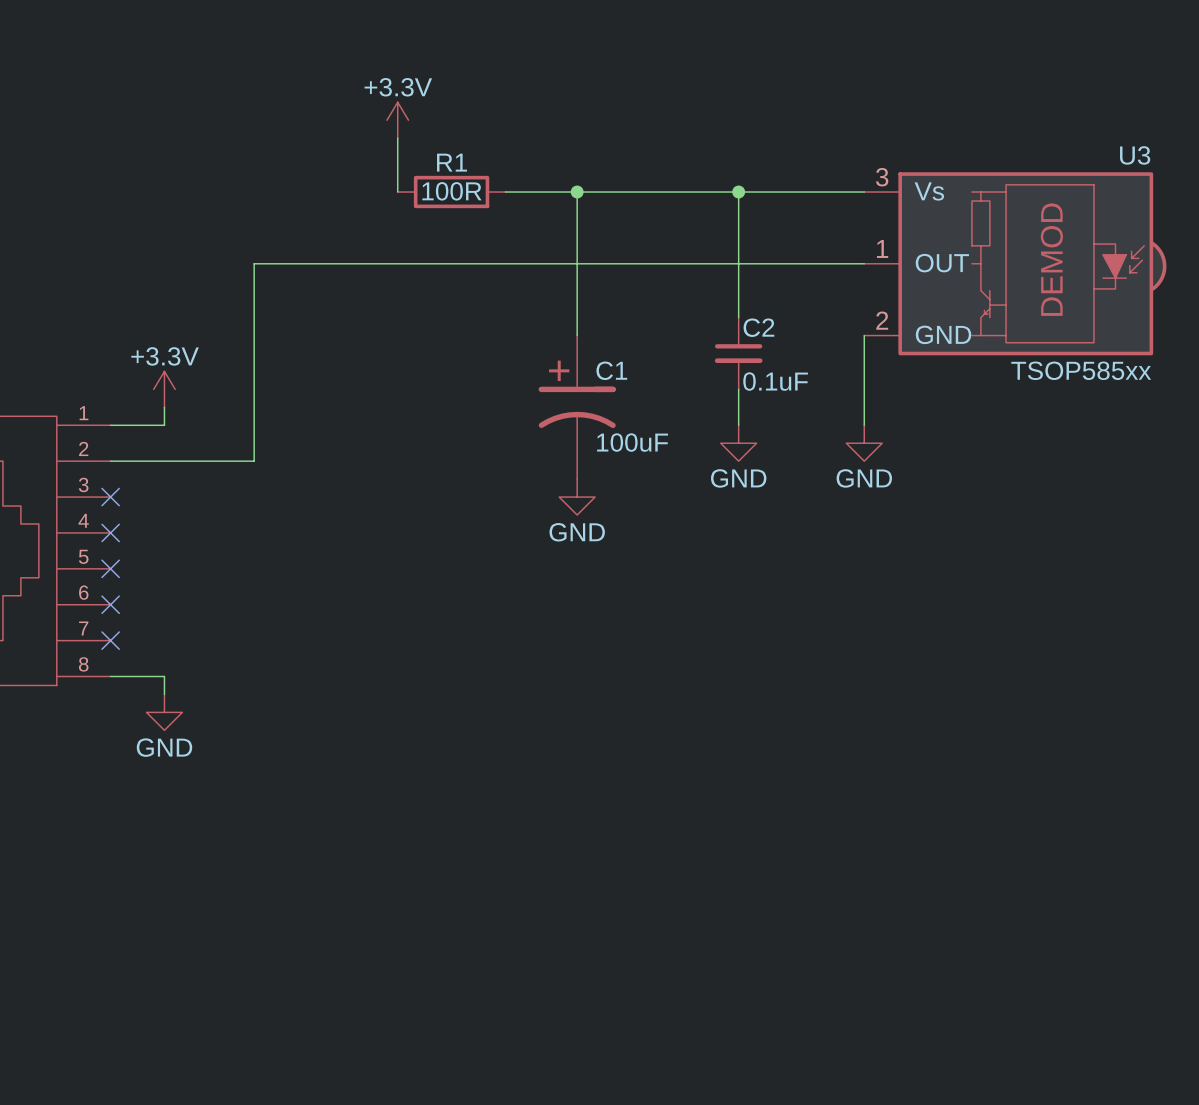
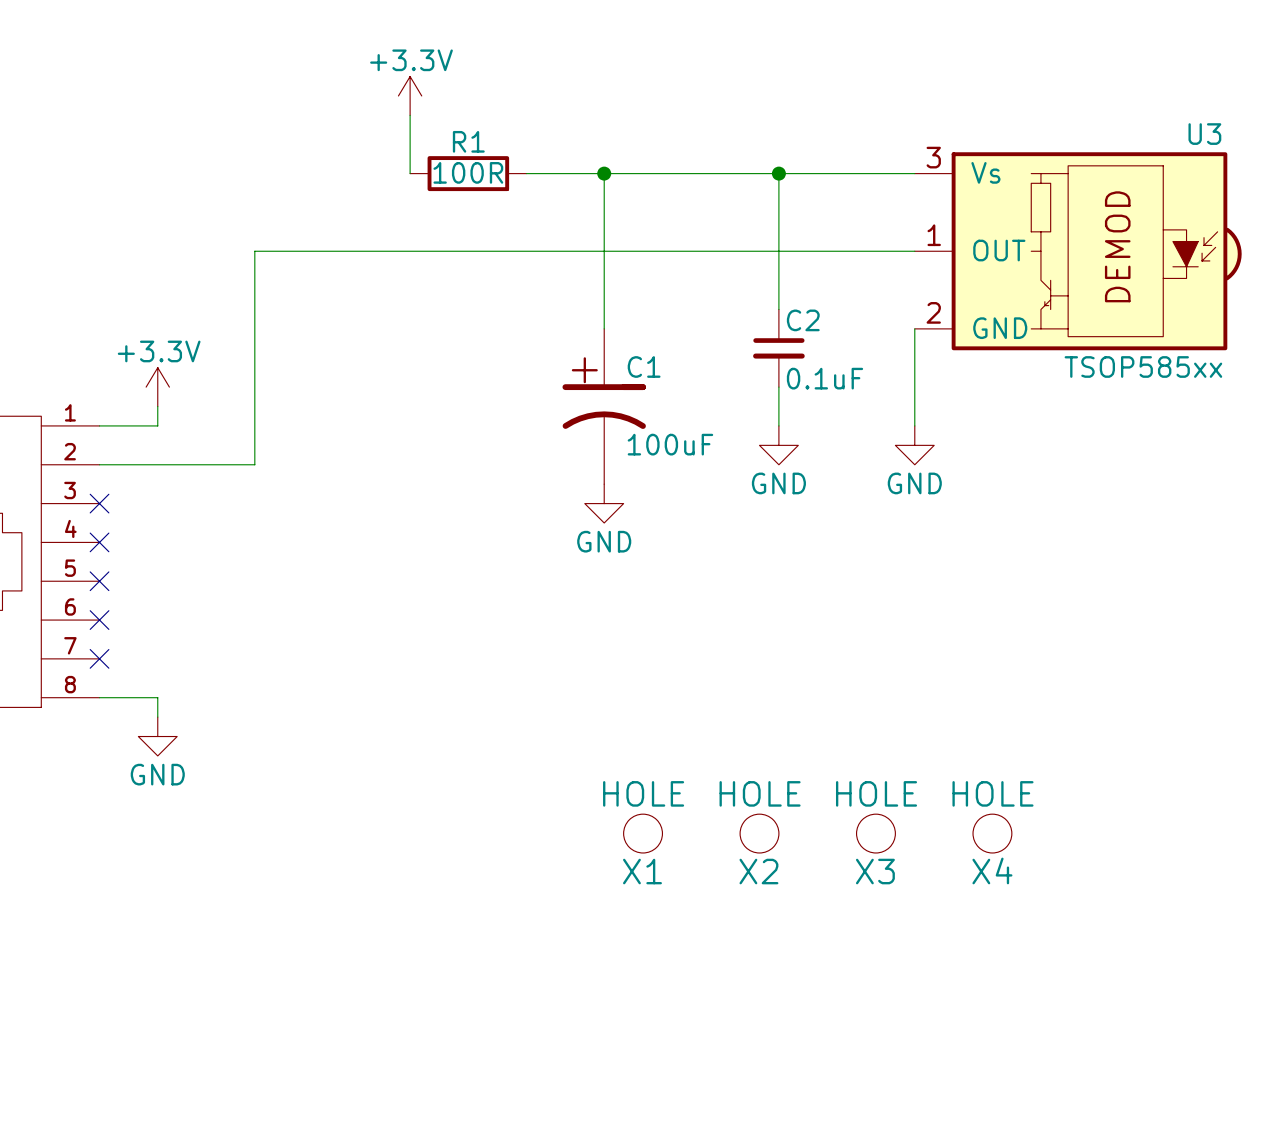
X1: none -> HOLE (643, 833)
X2: none -> HOLE (759, 833)
X3: none -> HOLE (875, 833)
X4: none -> HOLE (992, 833)

